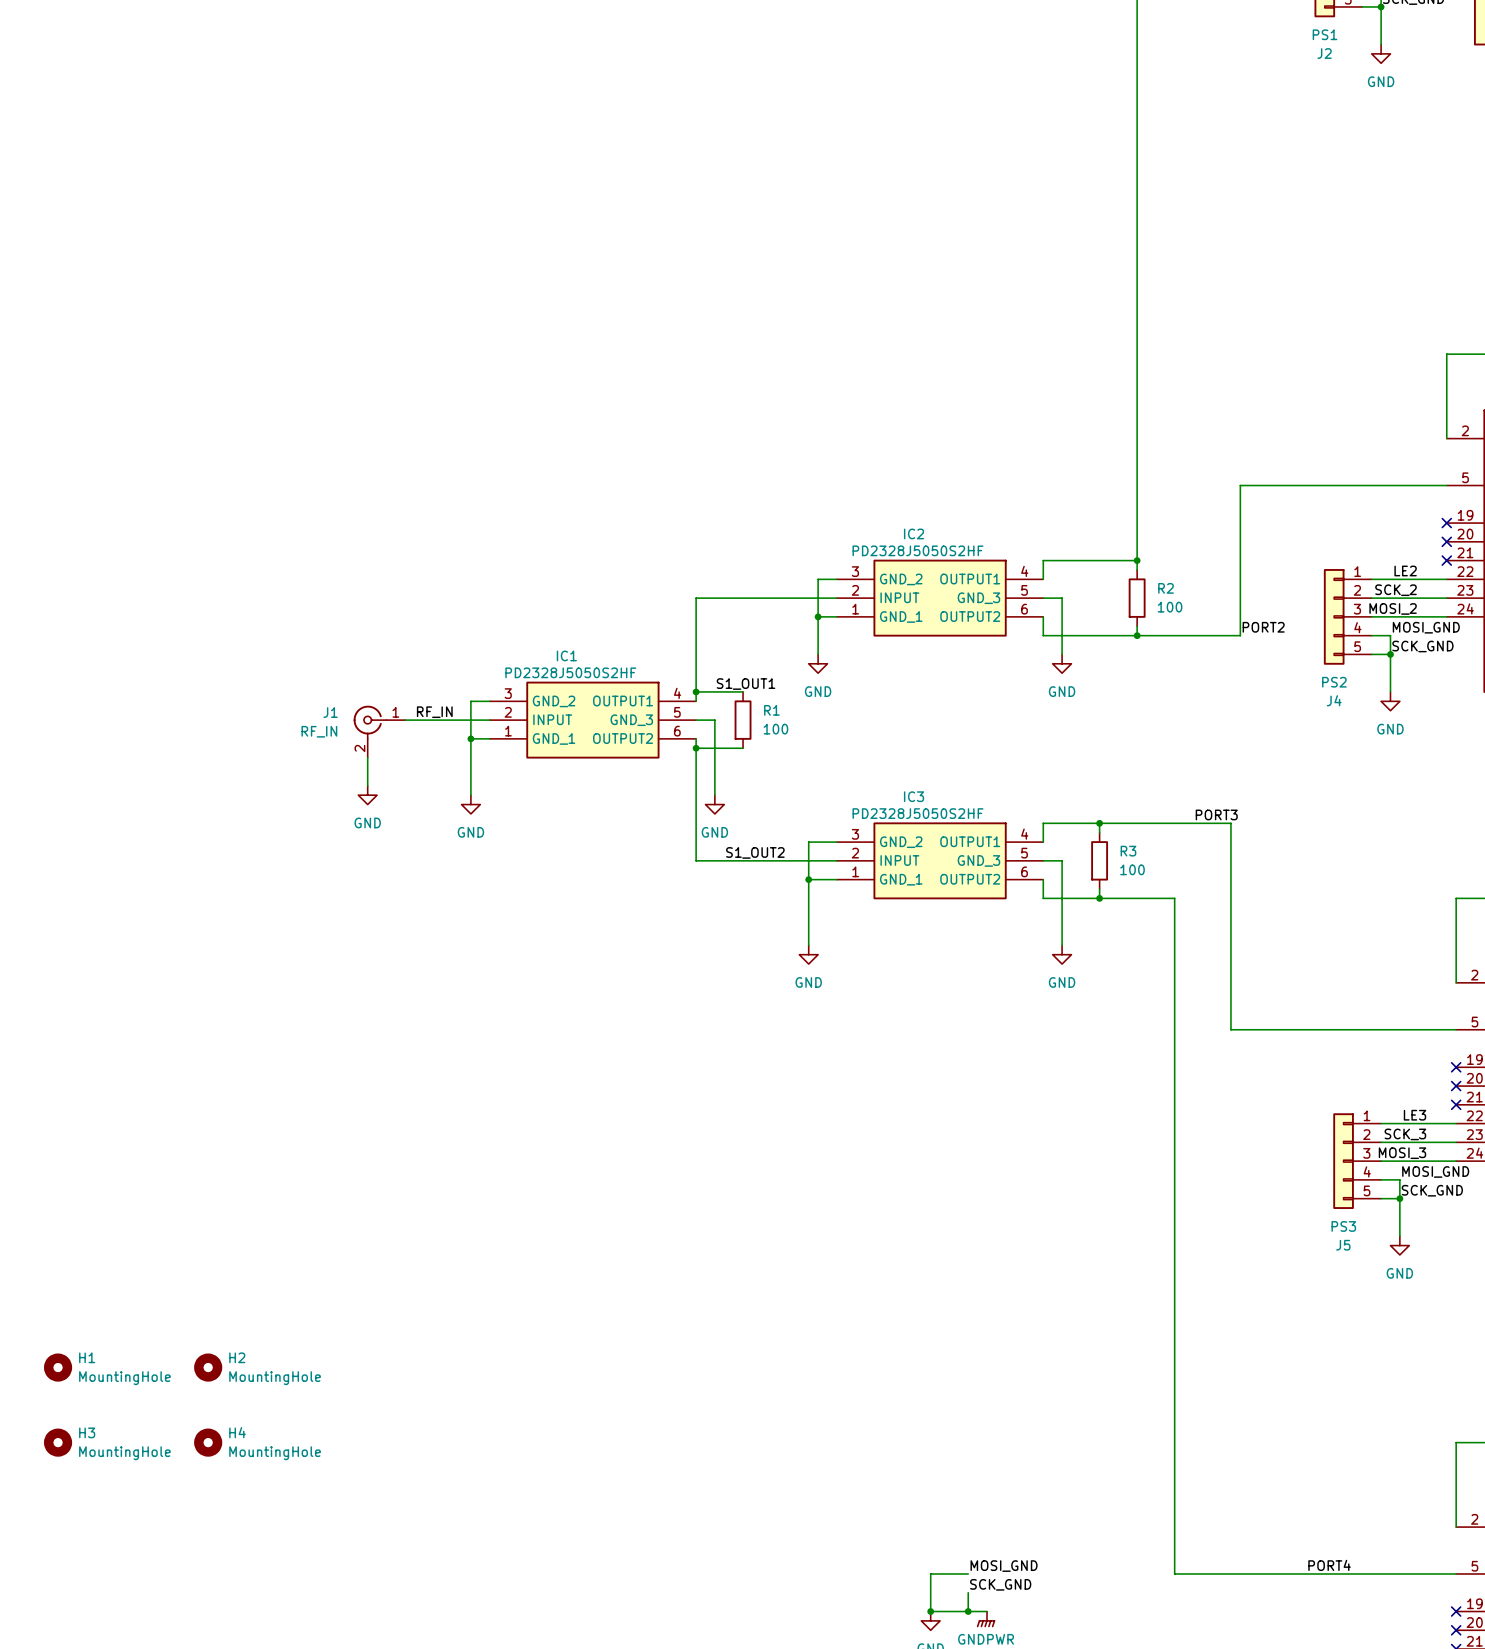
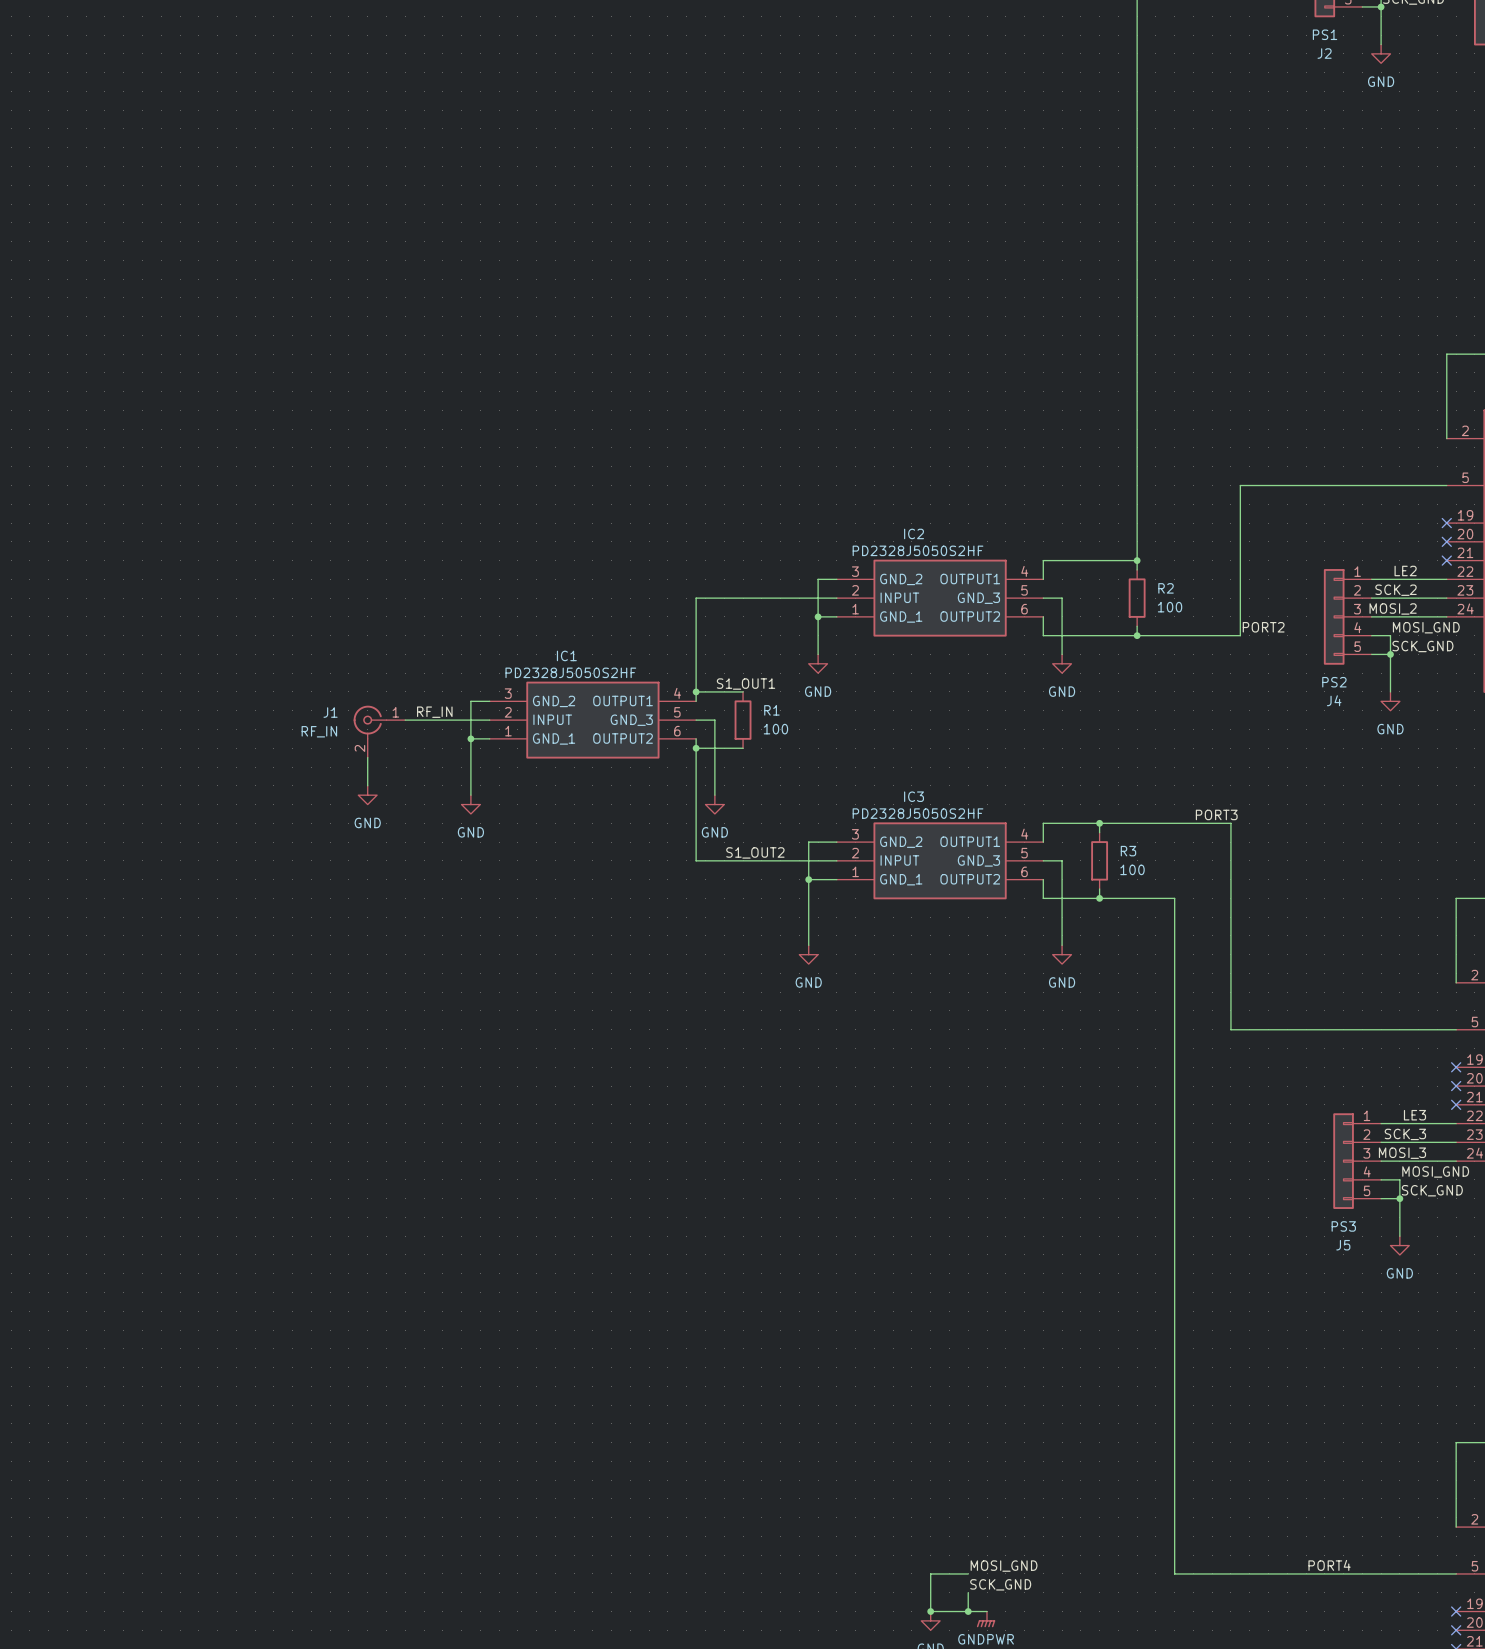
H1: MountingHole (58, 1367) -> none
H2: MountingHole (208, 1367) -> none
H3: MountingHole (58, 1442) -> none
H4: MountingHole (208, 1442) -> none

